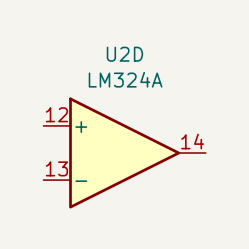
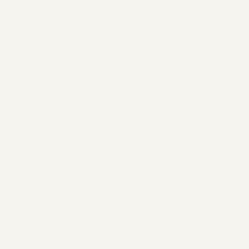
U2D: LM324A (124, 153) -> none

